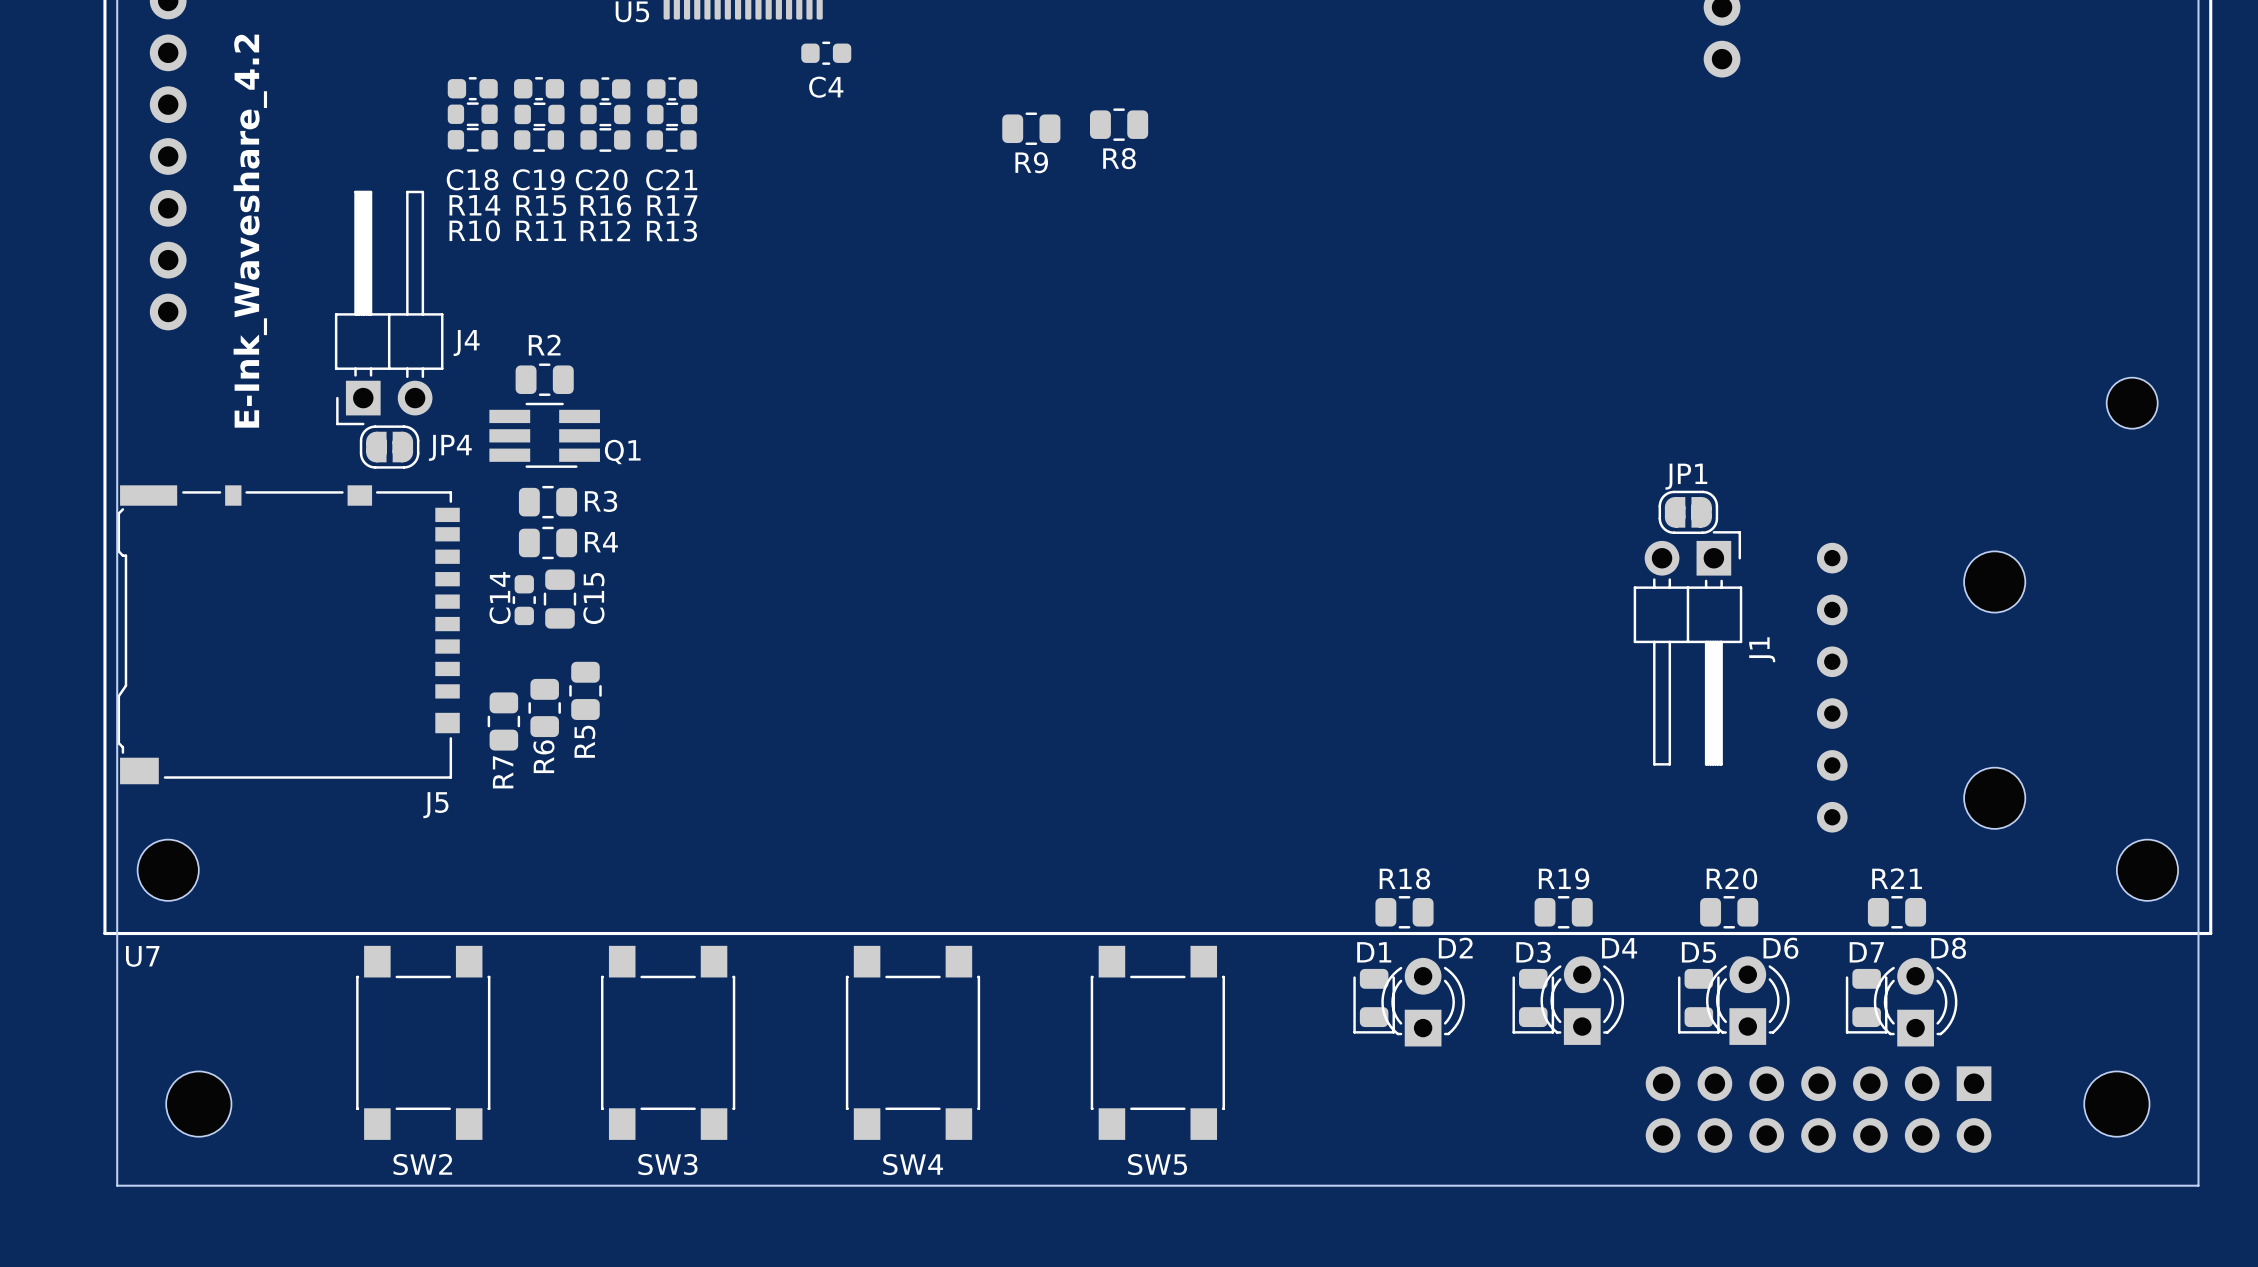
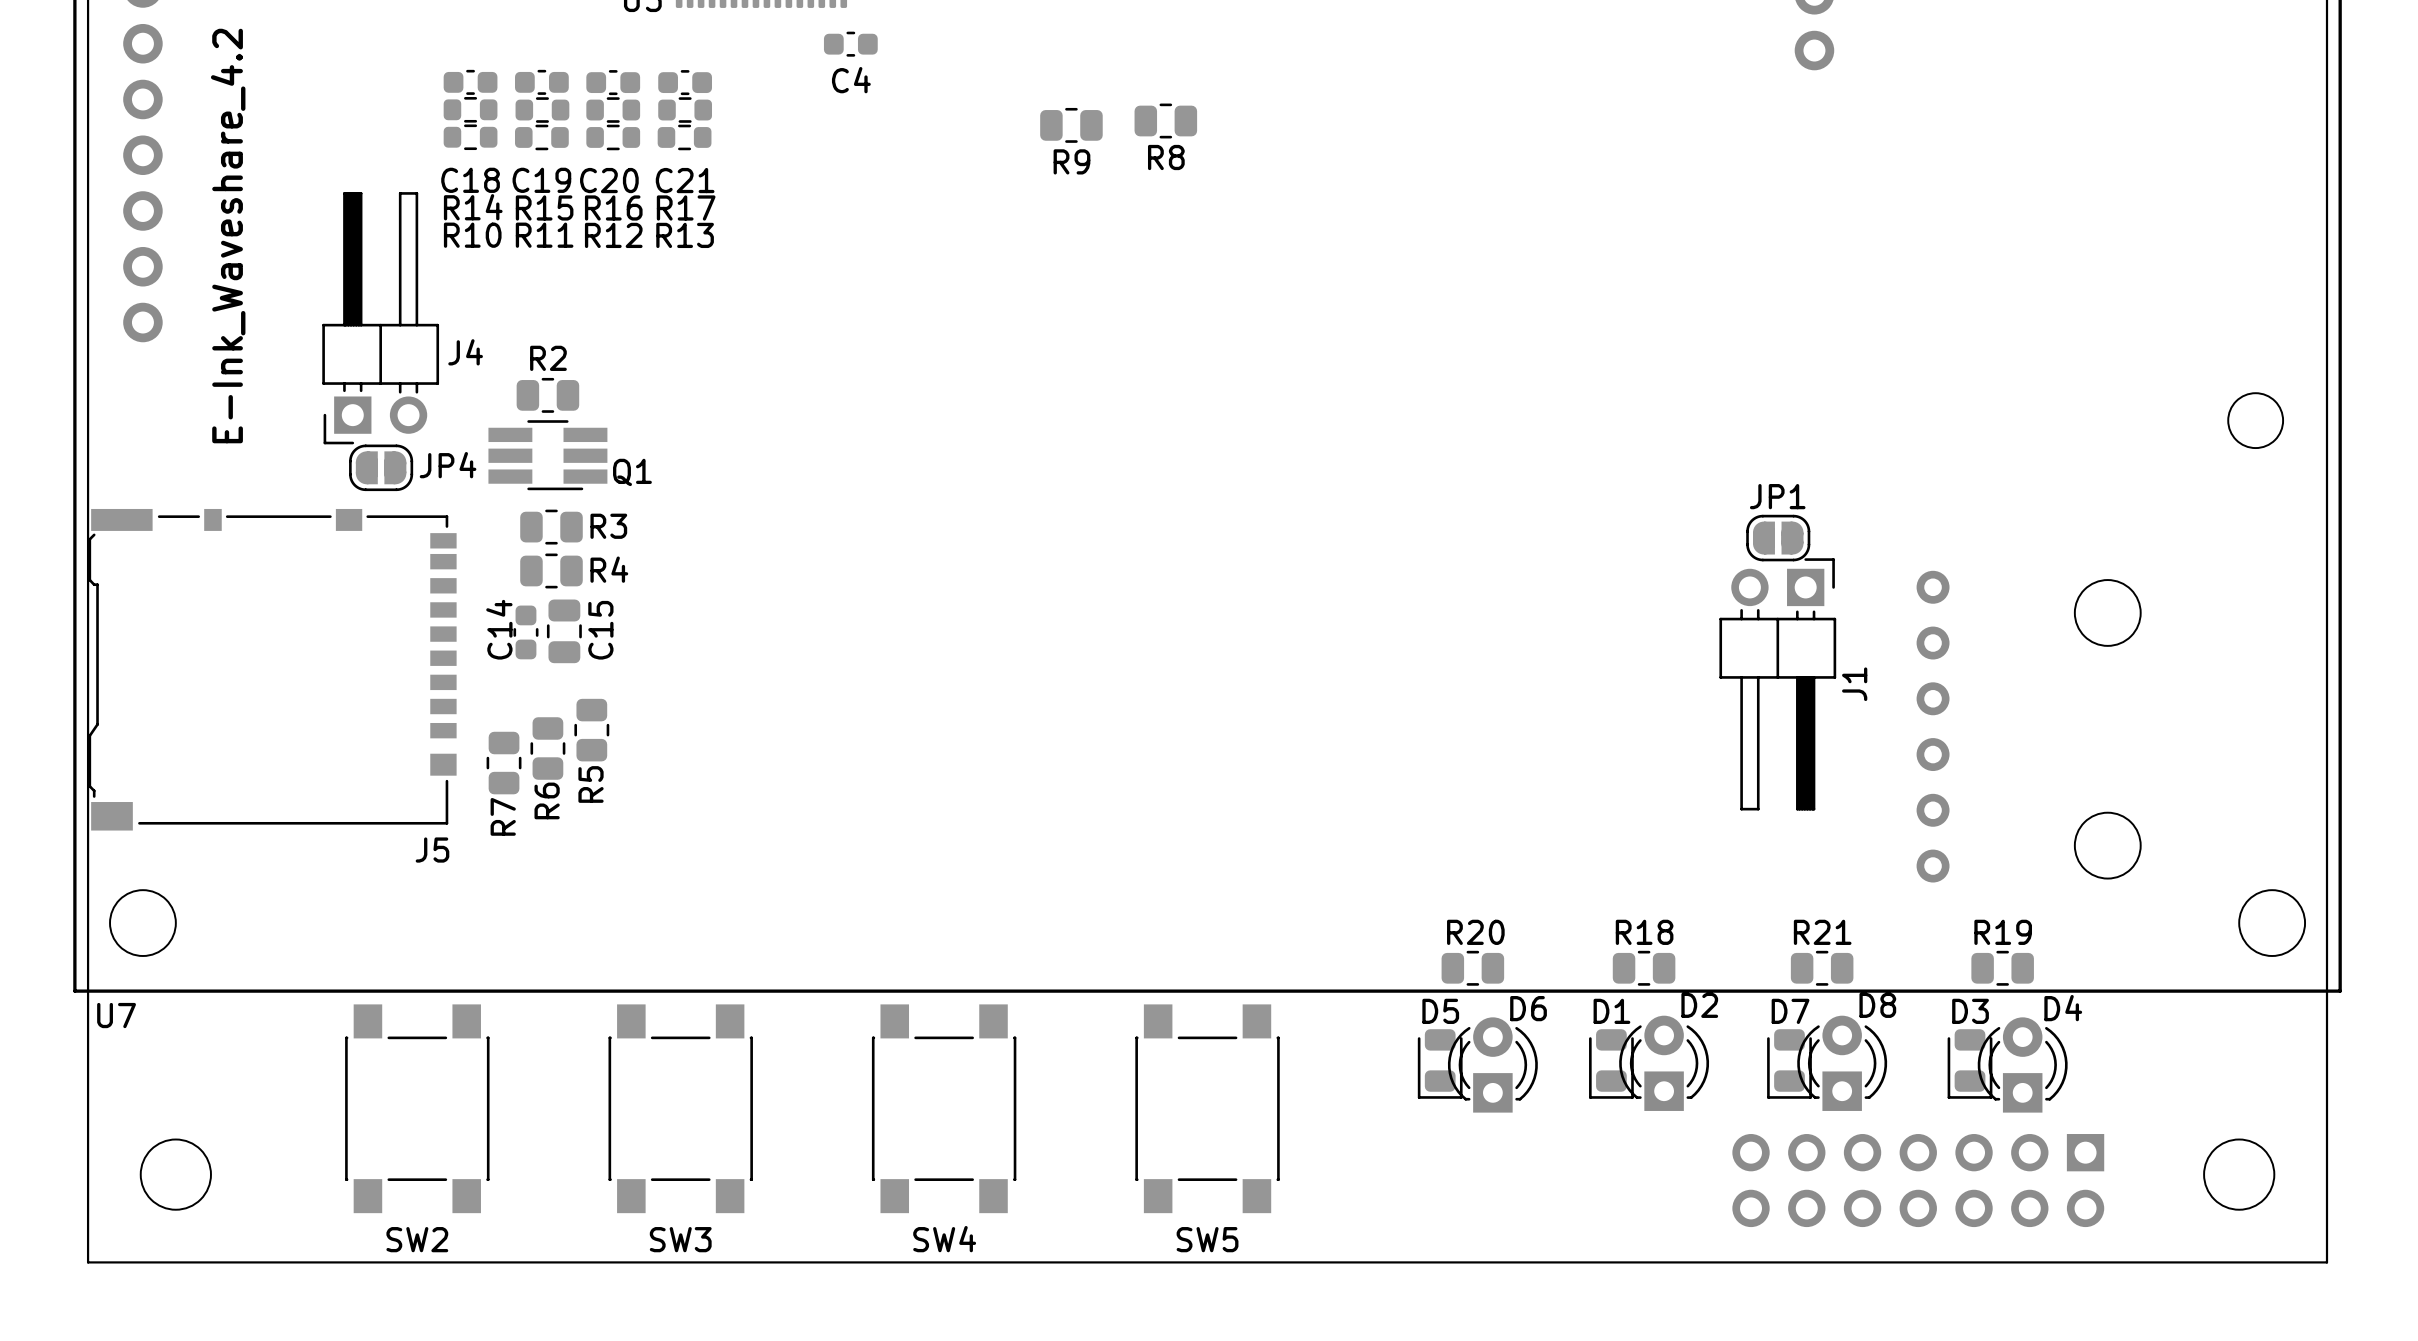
R18 name: R18 (1404, 878) -> R20 (1475, 932)
R19 name: R19 (1564, 878) -> R18 (1644, 932)
R20 name: R20 (1731, 878) -> R21 (1822, 932)
R21 name: R21 (1897, 878) -> R19 (2003, 932)
D2 name: D2 (1455, 948) -> D6 (1528, 1008)
D4 name: D4 (1619, 948) -> D2 (1699, 1005)
D6 name: D6 (1780, 948) -> D8 (1877, 1005)
D8 name: D8 (1948, 948) -> D4 (2063, 1008)
D1 name: D1 (1374, 952) -> D5 (1440, 1011)
D3 name: D3 (1533, 952) -> D1 (1611, 1011)
D5 name: D5 (1698, 952) -> D7 (1790, 1011)
D7 name: D7 (1866, 952) -> D3 (1970, 1011)

